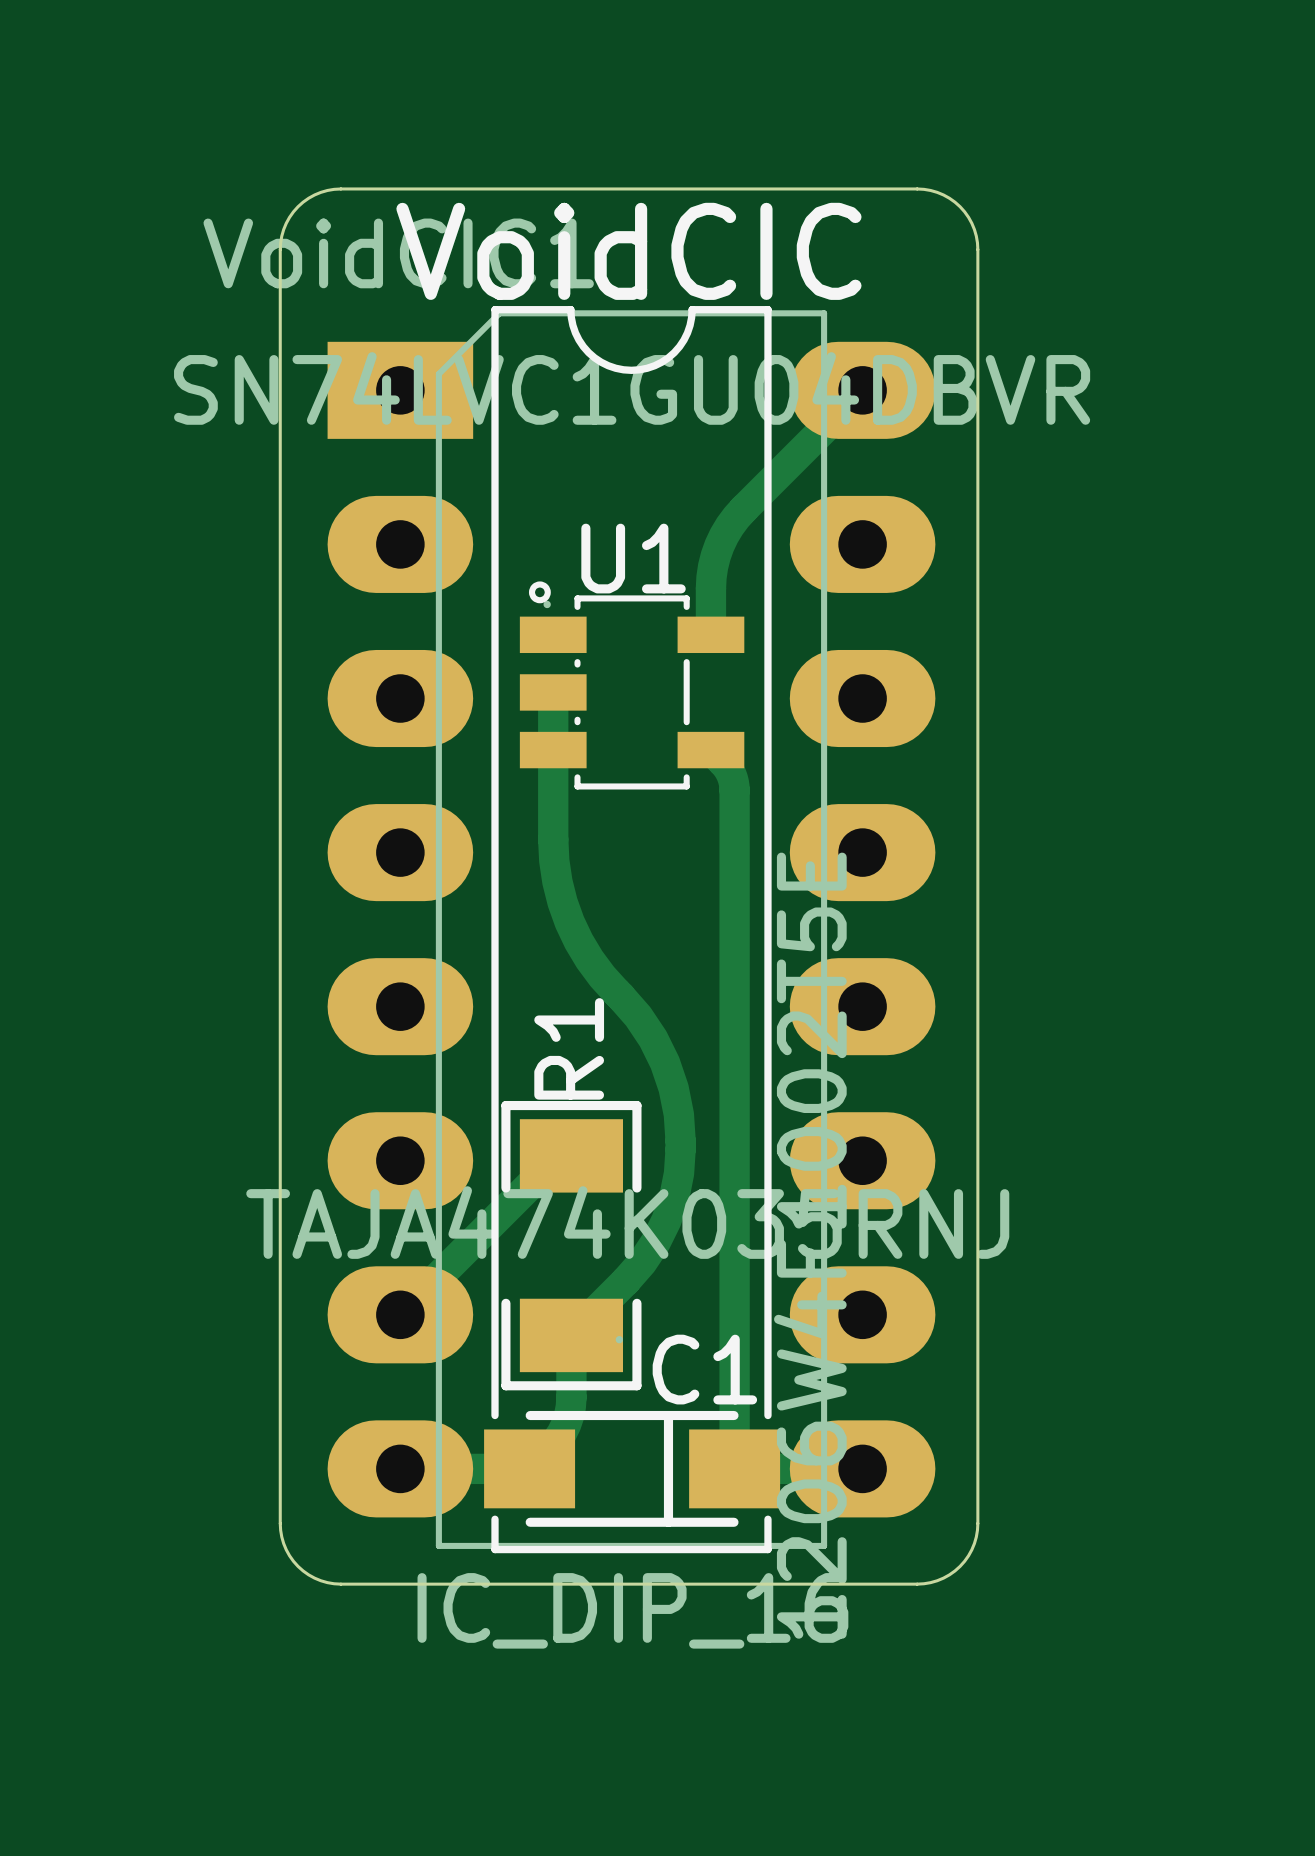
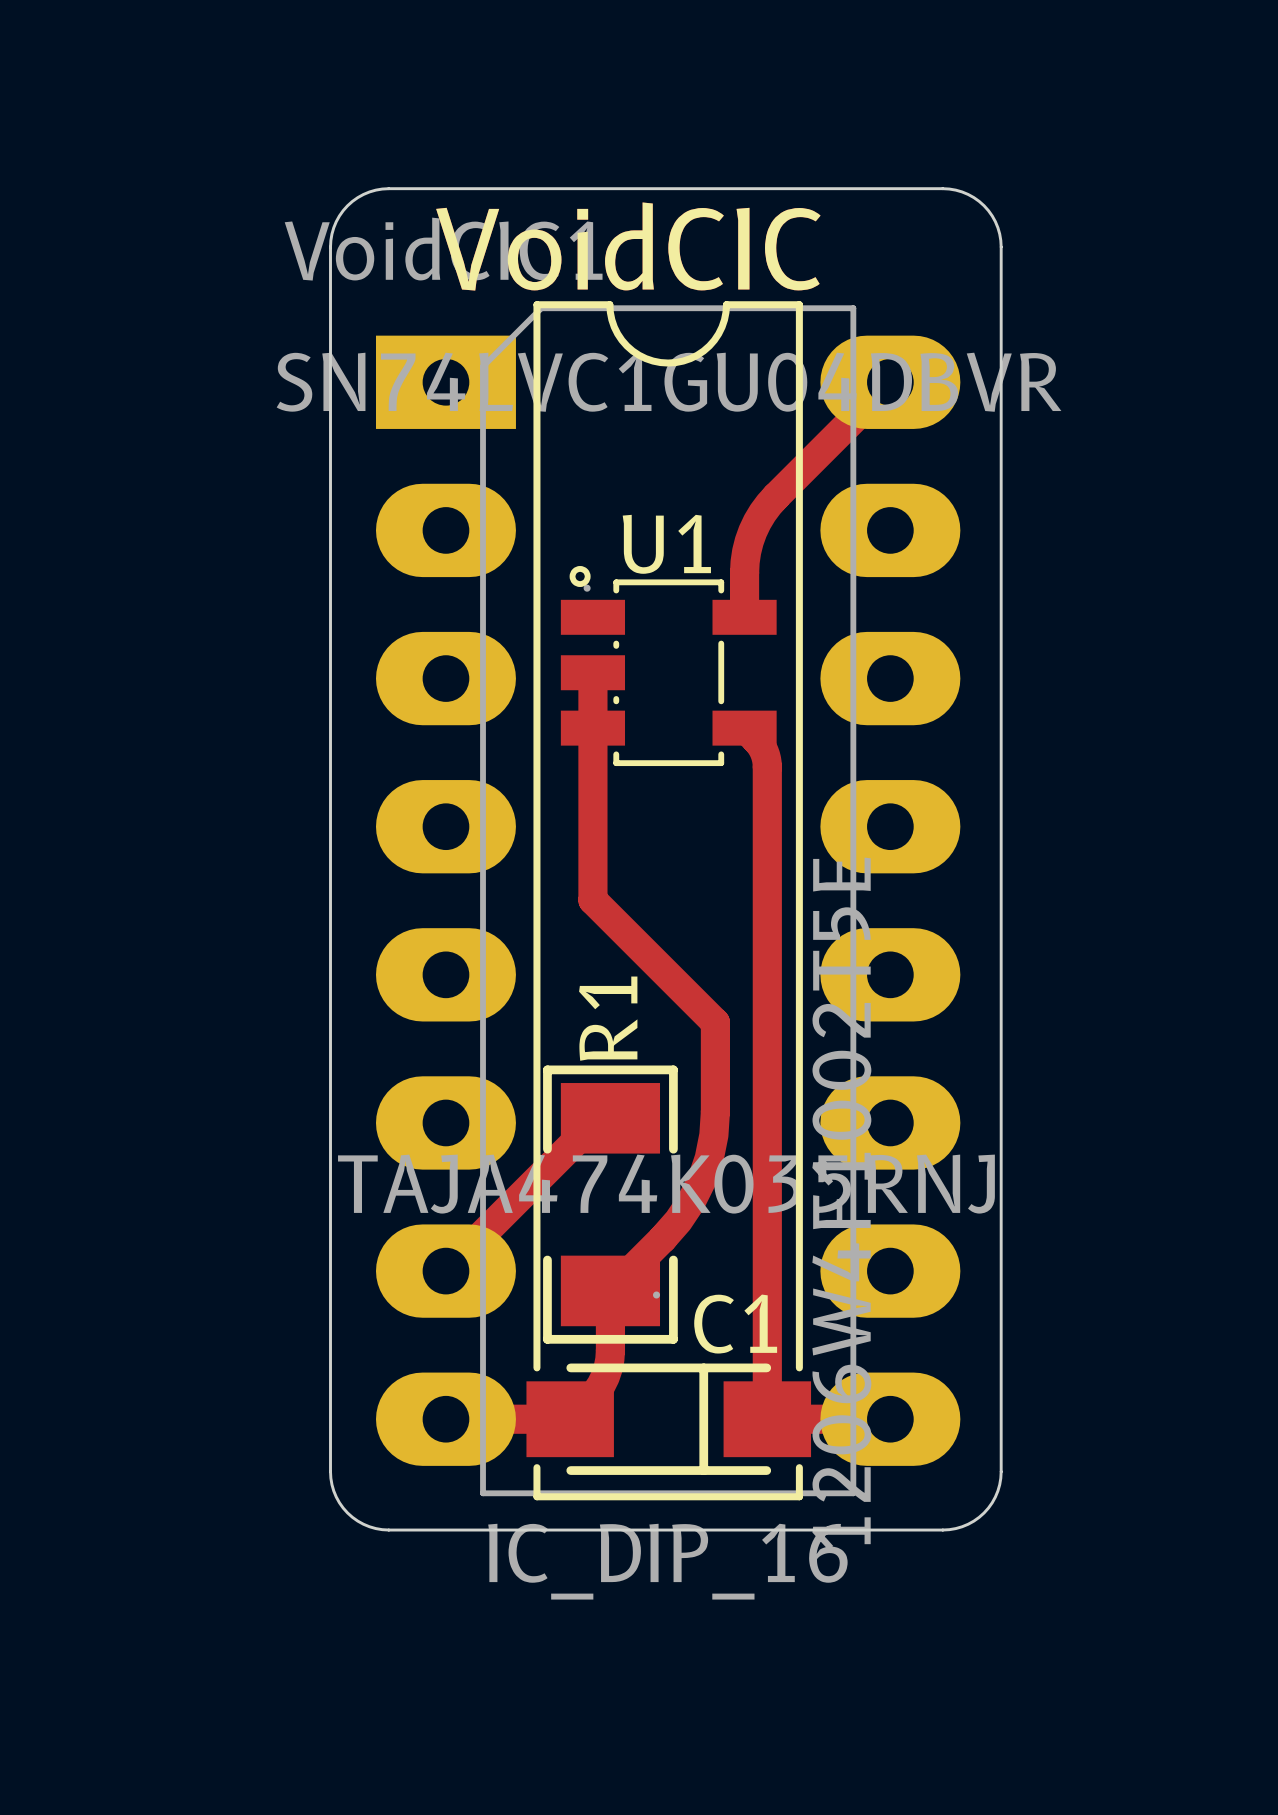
track: (553, 839) (557, 881) (569, 922) (589, 959) (616, 992) -> (592, 814) (592, 900) (653, 961)
track: (620, 996) (638, 1016) (653, 1038) (665, 1062) (673, 1088) (678, 1114) (680, 1141) -> (657, 964) (715, 1022) (715, 1104)

